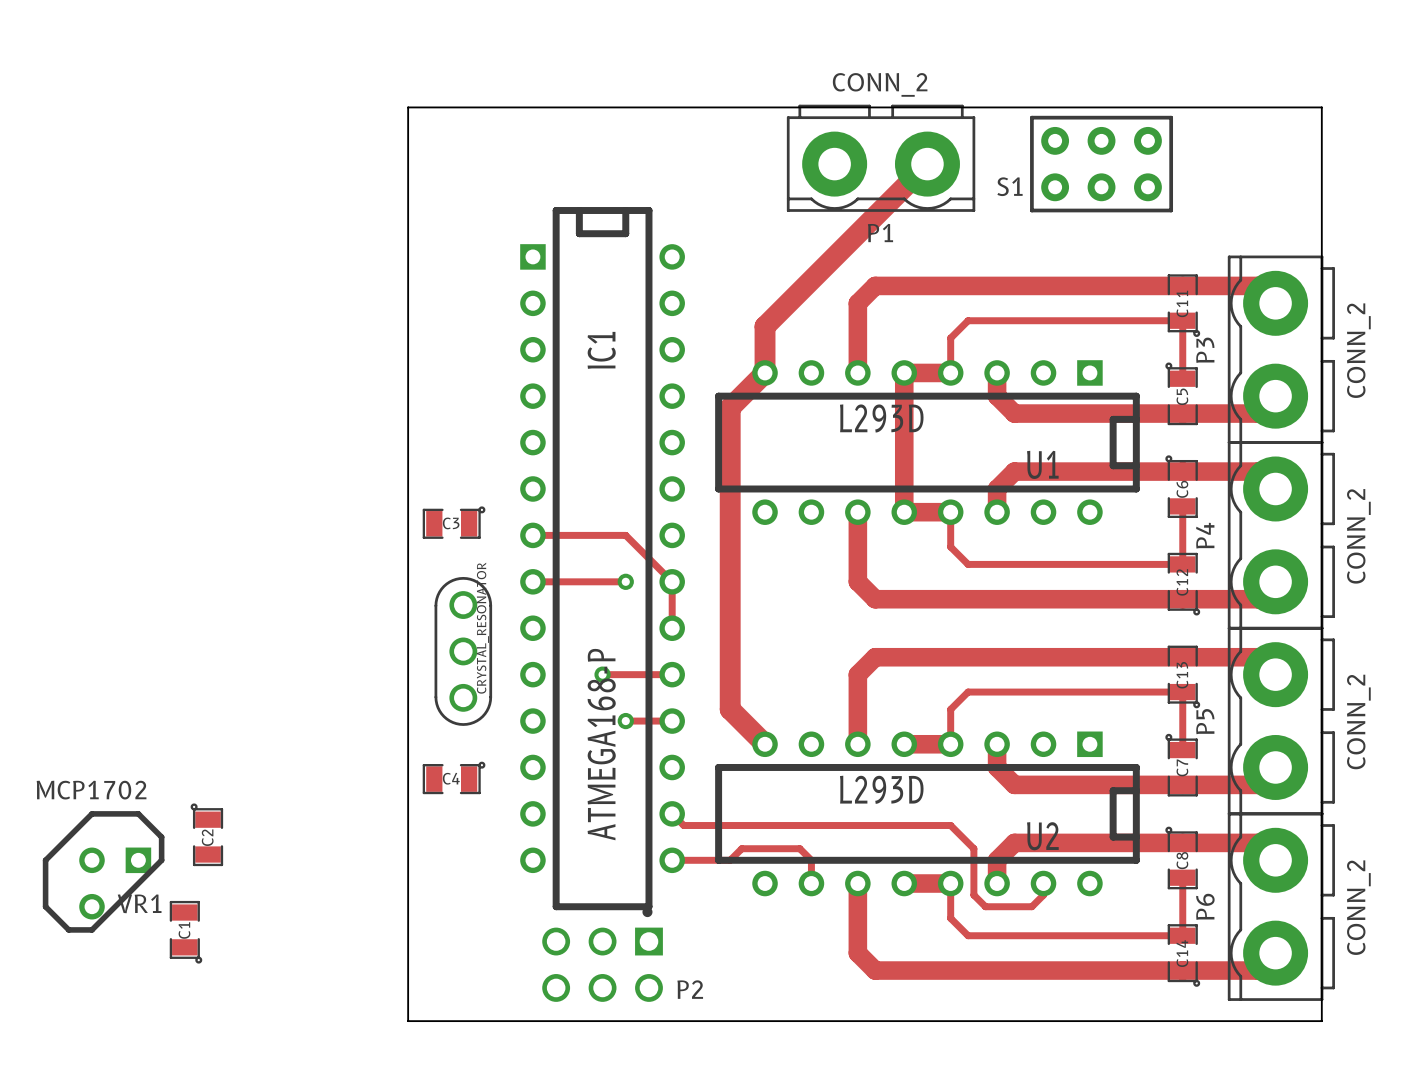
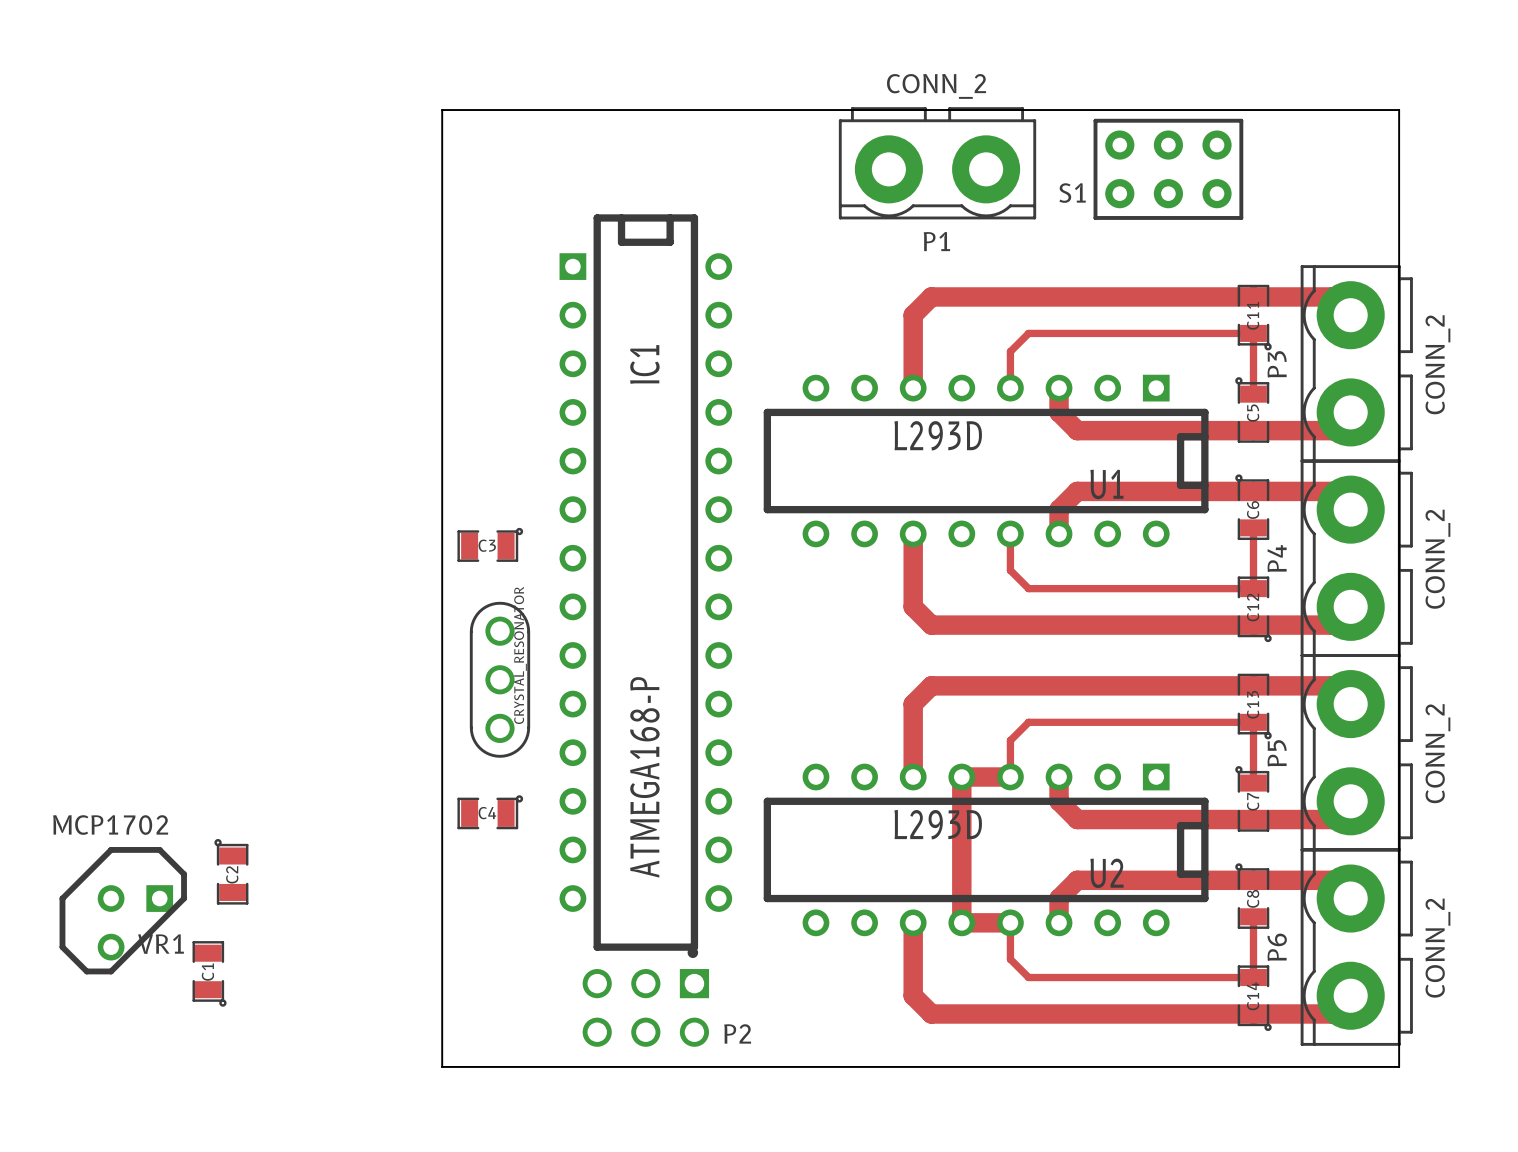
track: (927, 164) (765, 326) (765, 372) (730, 407) (730, 709) (765, 744) -> none
track: (950, 372) (904, 372) (904, 512) (950, 512) -> none
track: (532, 535) (625, 535) (672, 581) (672, 628) -> none
track: (532, 581) (625, 581) -> none
via: (625, 581) -> none
track: (602, 674) (672, 674) -> none
via: (602, 674) -> none
track: (625, 721) (672, 721) -> none
via: (625, 721) -> none
track: none -> (961, 777) (961, 922)
track: (672, 813) (683, 825) (950, 825) (973, 848) (973, 895) (985, 906) (1031, 906) (1043, 895) (1043, 883) -> none
track: (672, 860) (730, 860) (741, 848) (799, 848) (811, 860) (811, 883) -> none

